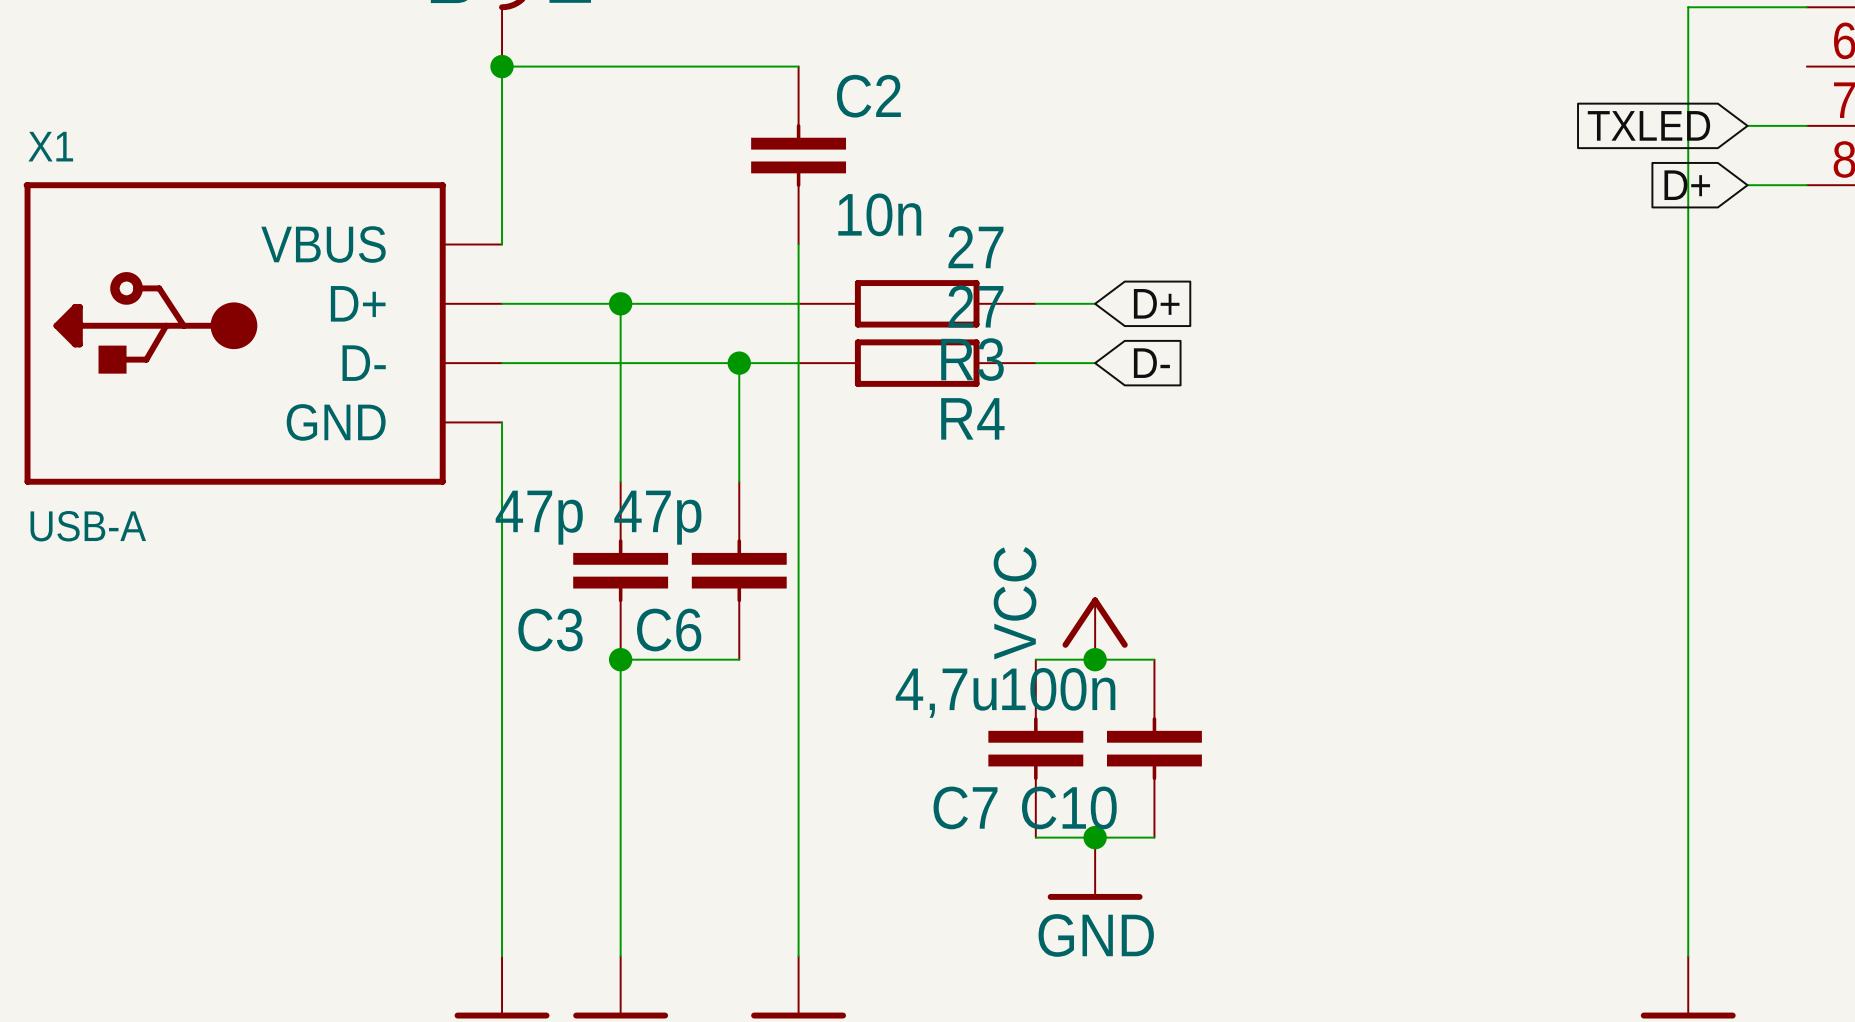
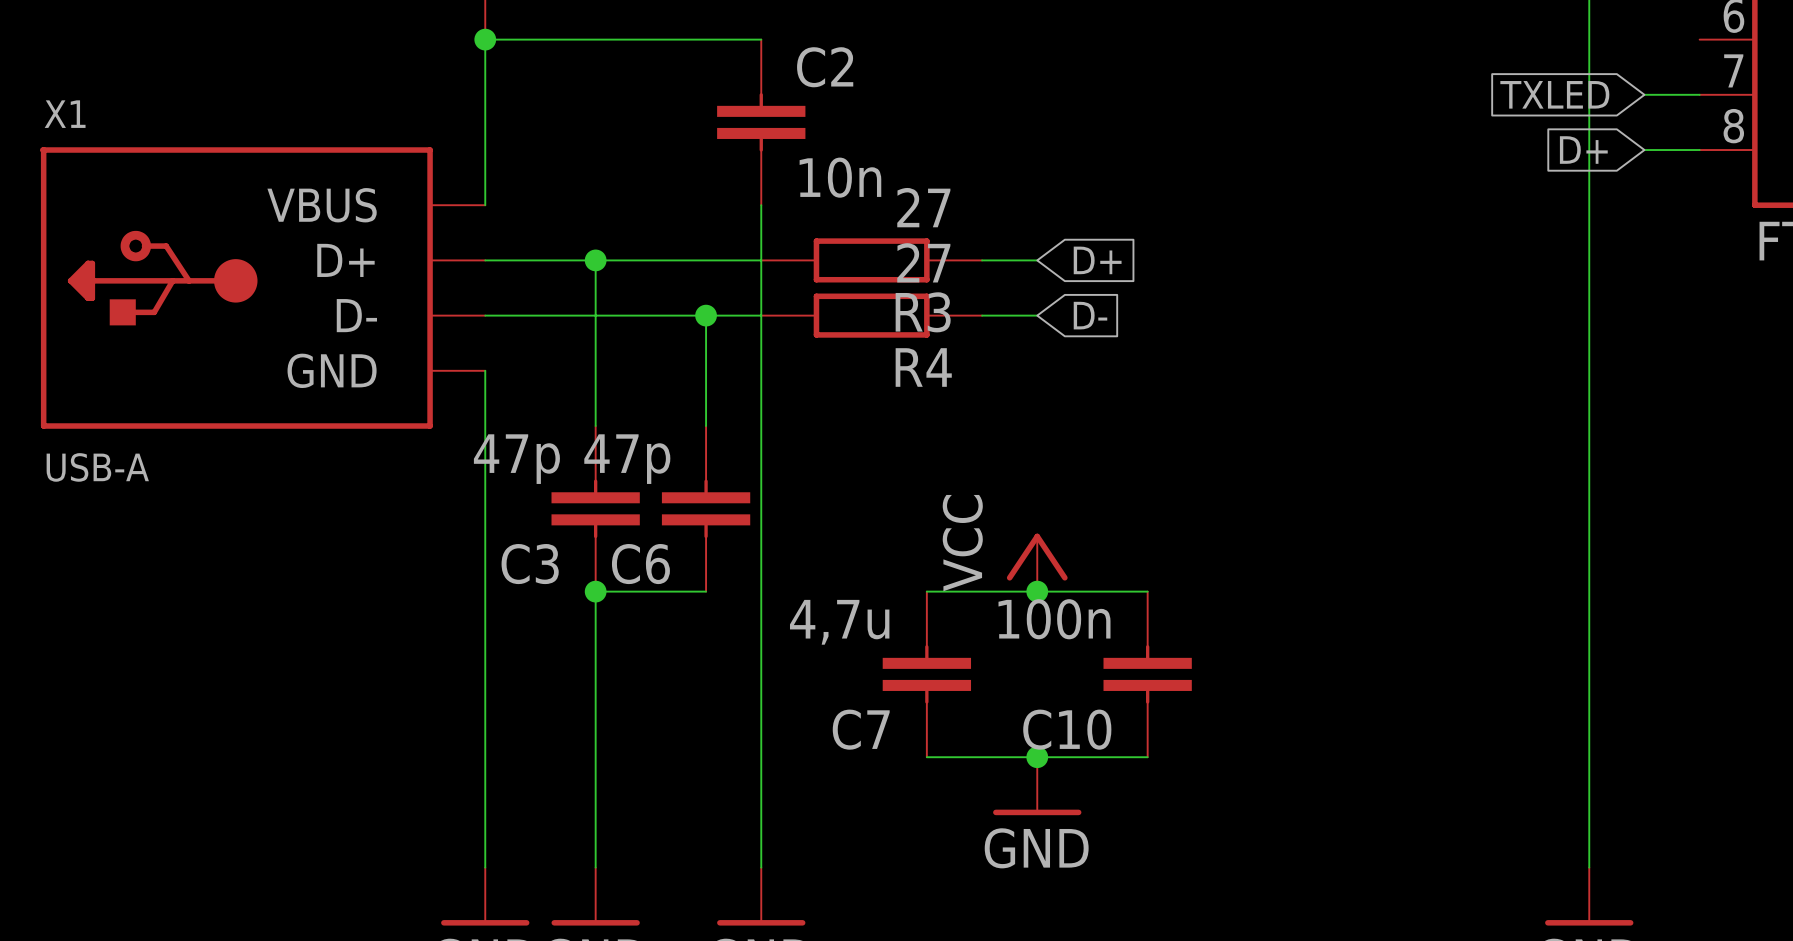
wire: none -> (926, 591) (982, 591)
wire: none -> (1092, 591) (1147, 591)
C7 position: (1035, 748) -> (926, 674)
C10 position: (1154, 748) -> (1147, 674)
wire: none -> (926, 757) (982, 757)
wire: none -> (1092, 757) (1147, 757)

